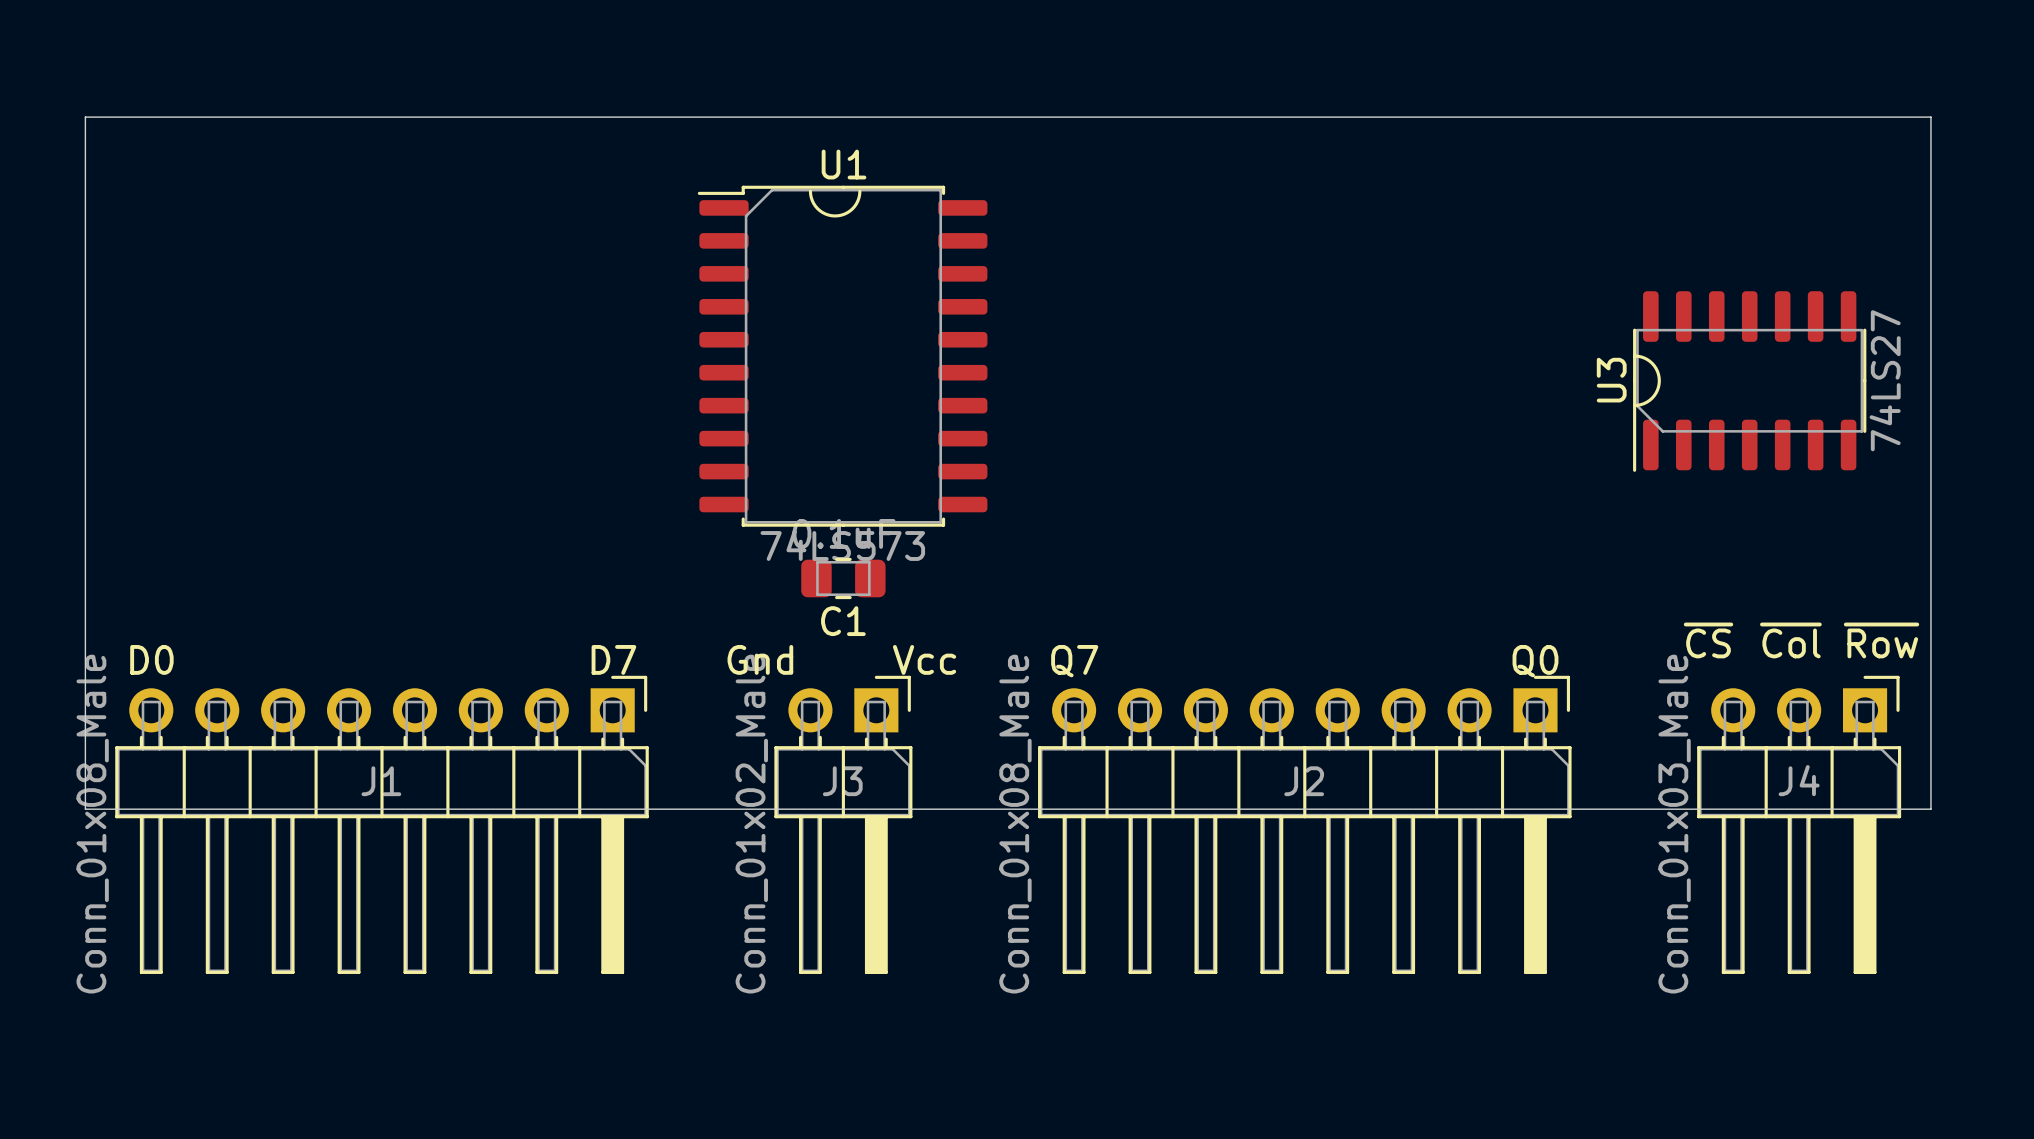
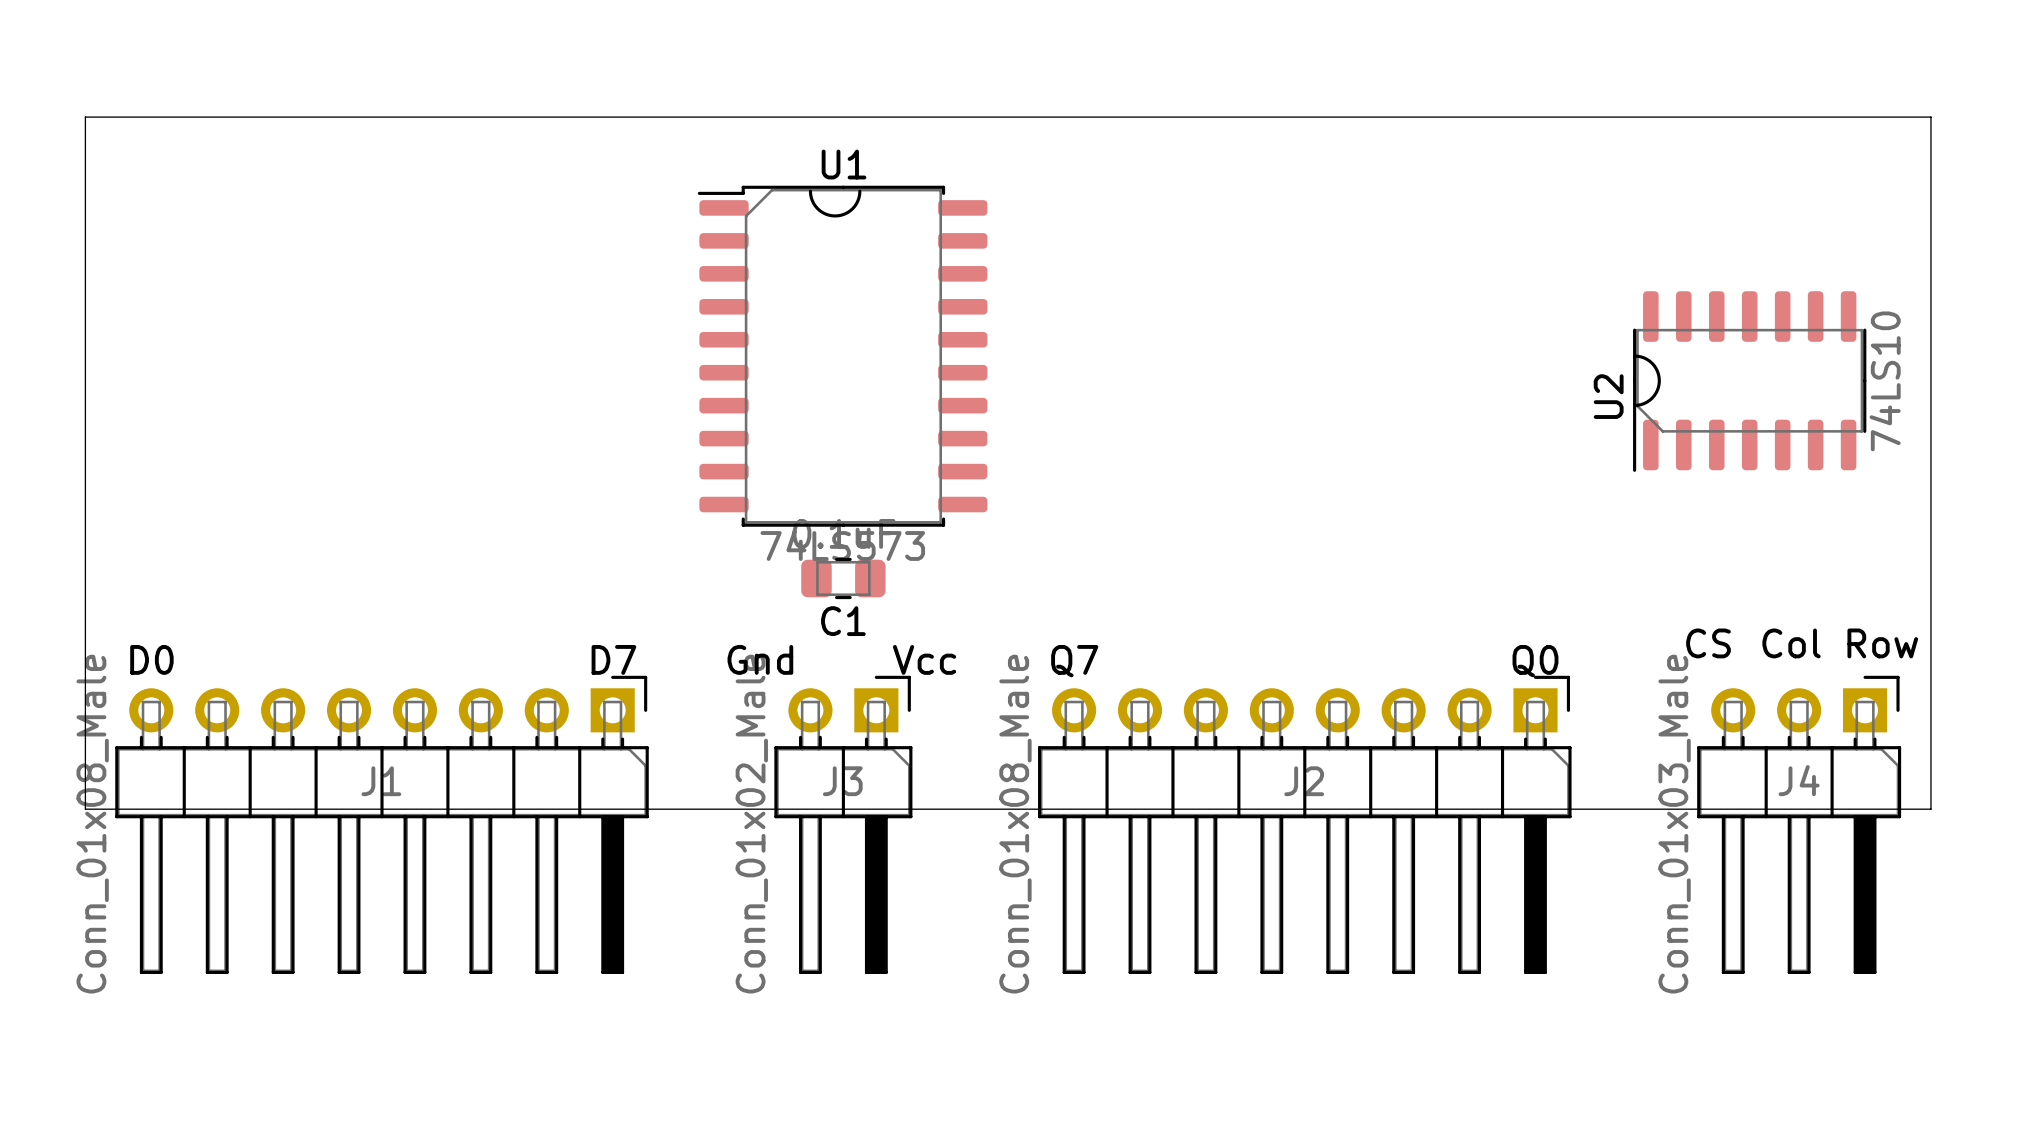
U3 name: U3 (1611, 380) -> U2 (1608, 396)
U3 value: 74LS27 (1885, 380) -> 74LS10 (1885, 381)
text: ~{CS} (1708, 640) -> CS (1708, 643)
text: ~{Col} (1790, 640) -> Col (1791, 643)
text: ~{Row} (1881, 640) -> Row (1882, 643)

